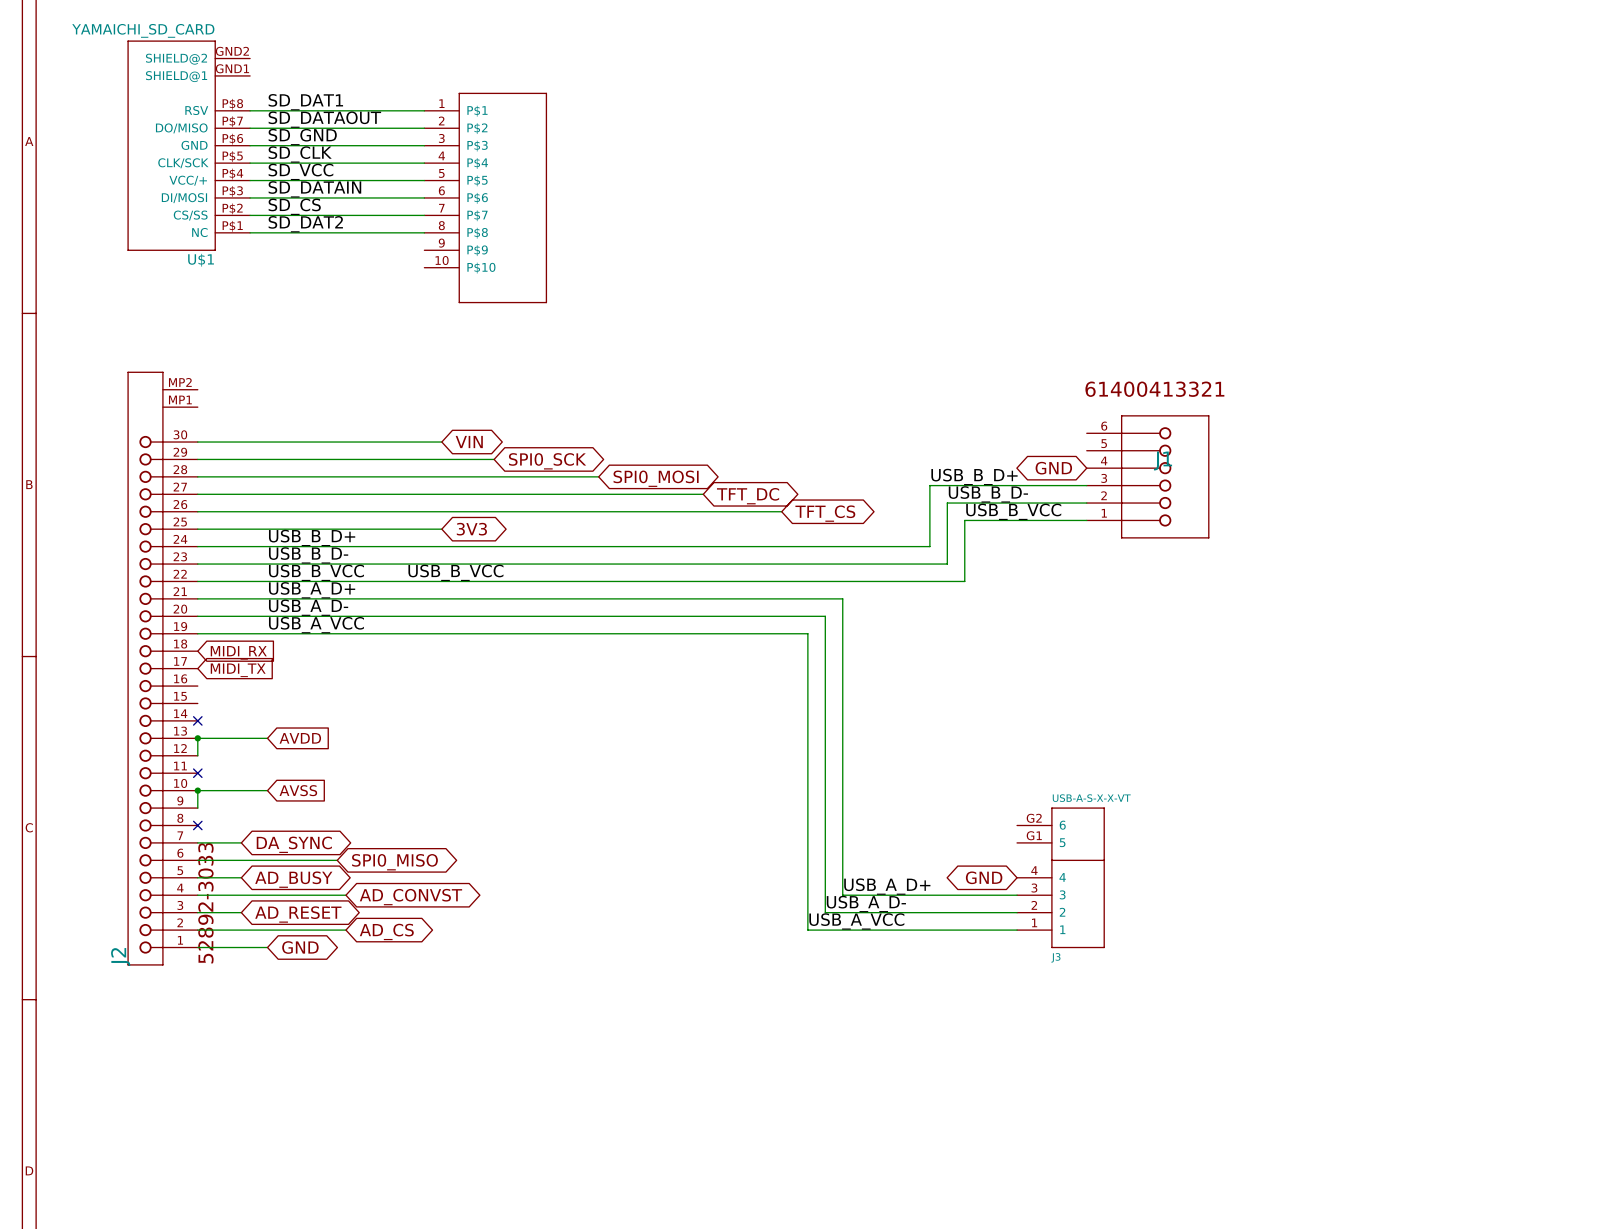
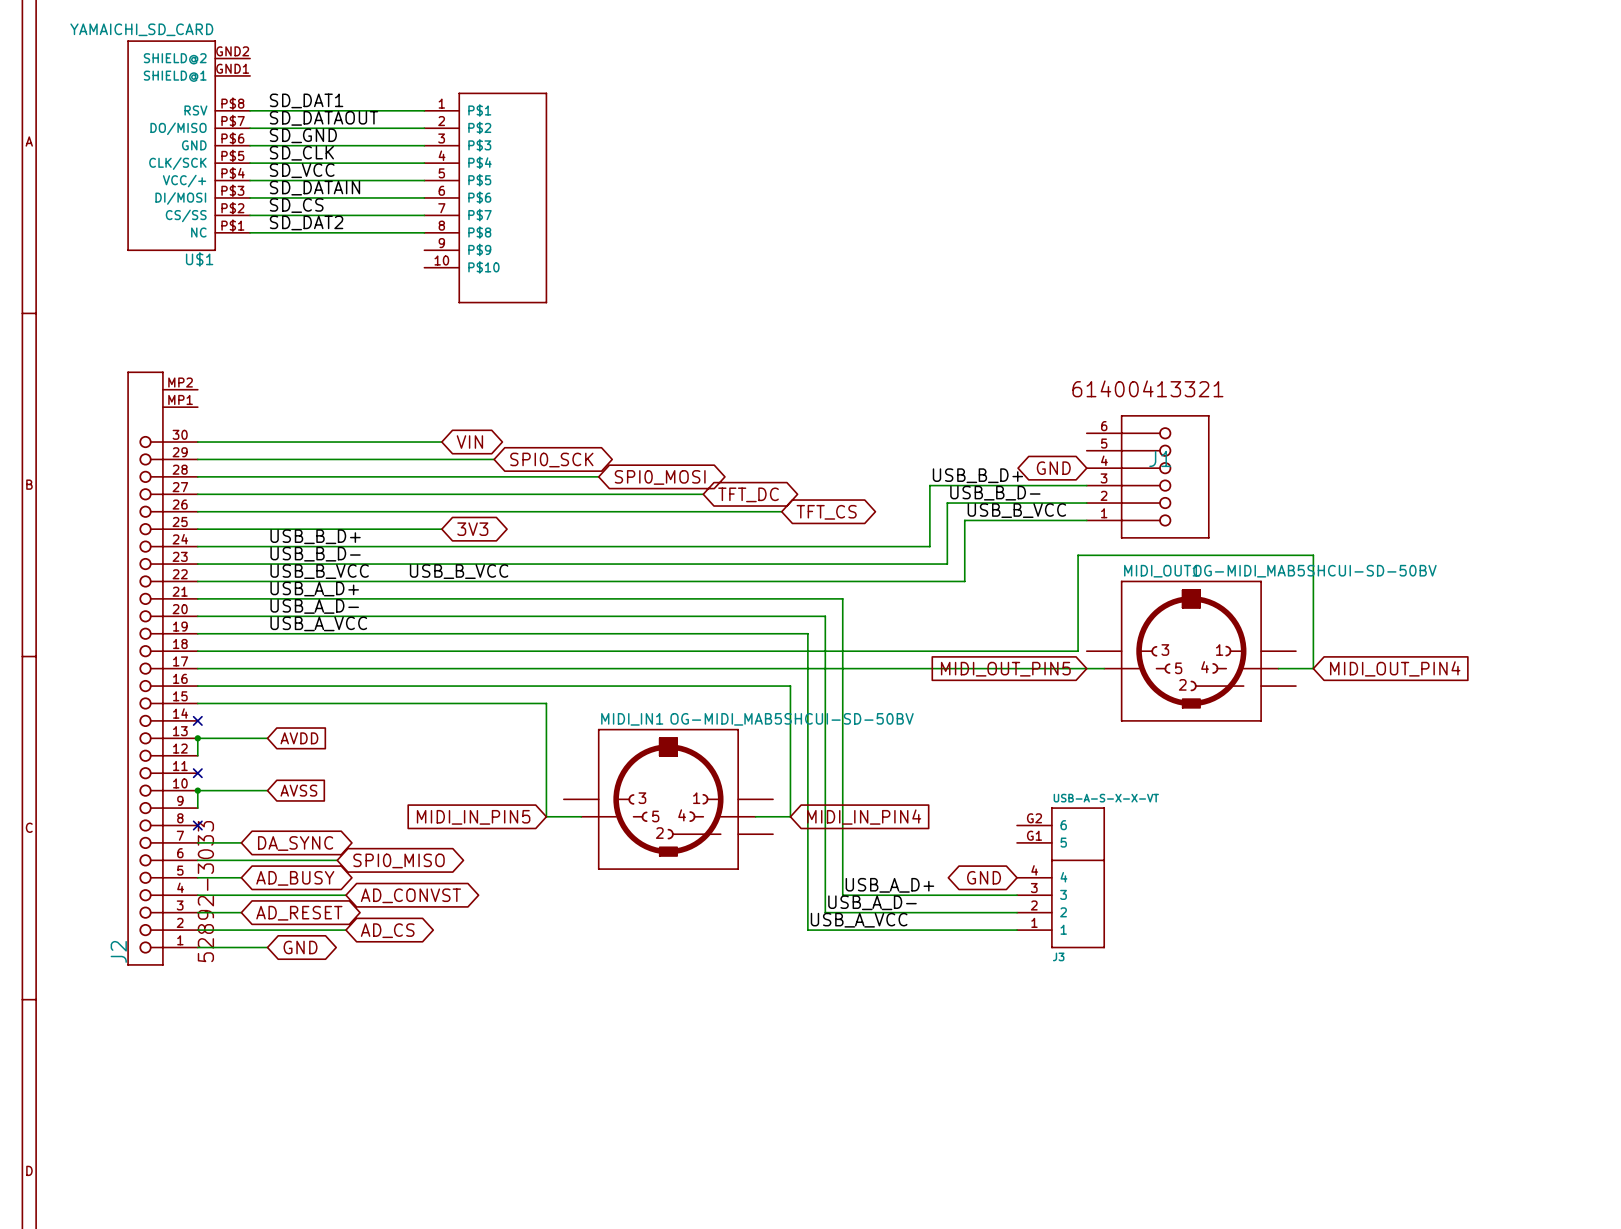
wire: none -> (197, 651) (1078, 651) (1078, 555) (1313, 555) (1313, 668) (1278, 668)
MIDI_OUT1: none -> OG-MIDI_MAB5SHCUI-SD-50BV (1191, 651)
global label: MIDI_RX (238, 652) -> none
wire: none -> (197, 668) (1104, 668)
global label: MIDI_TX (238, 670) -> none
global label: none -> MIDI_OUT_PIN5 (1005, 669)
global label: none -> MIDI_OUT_PIN4 (1395, 668)
wire: none -> (197, 686) (790, 686) (790, 816) (755, 816)
wire: none -> (197, 703) (546, 703) (546, 816) (581, 816)
MIDI_IN1: none -> OG-MIDI_MAB5SHCUI-SD-50BV (668, 799)
global label: none -> MIDI_IN_PIN5 (473, 817)
global label: none -> MIDI_IN_PIN4 (864, 817)

